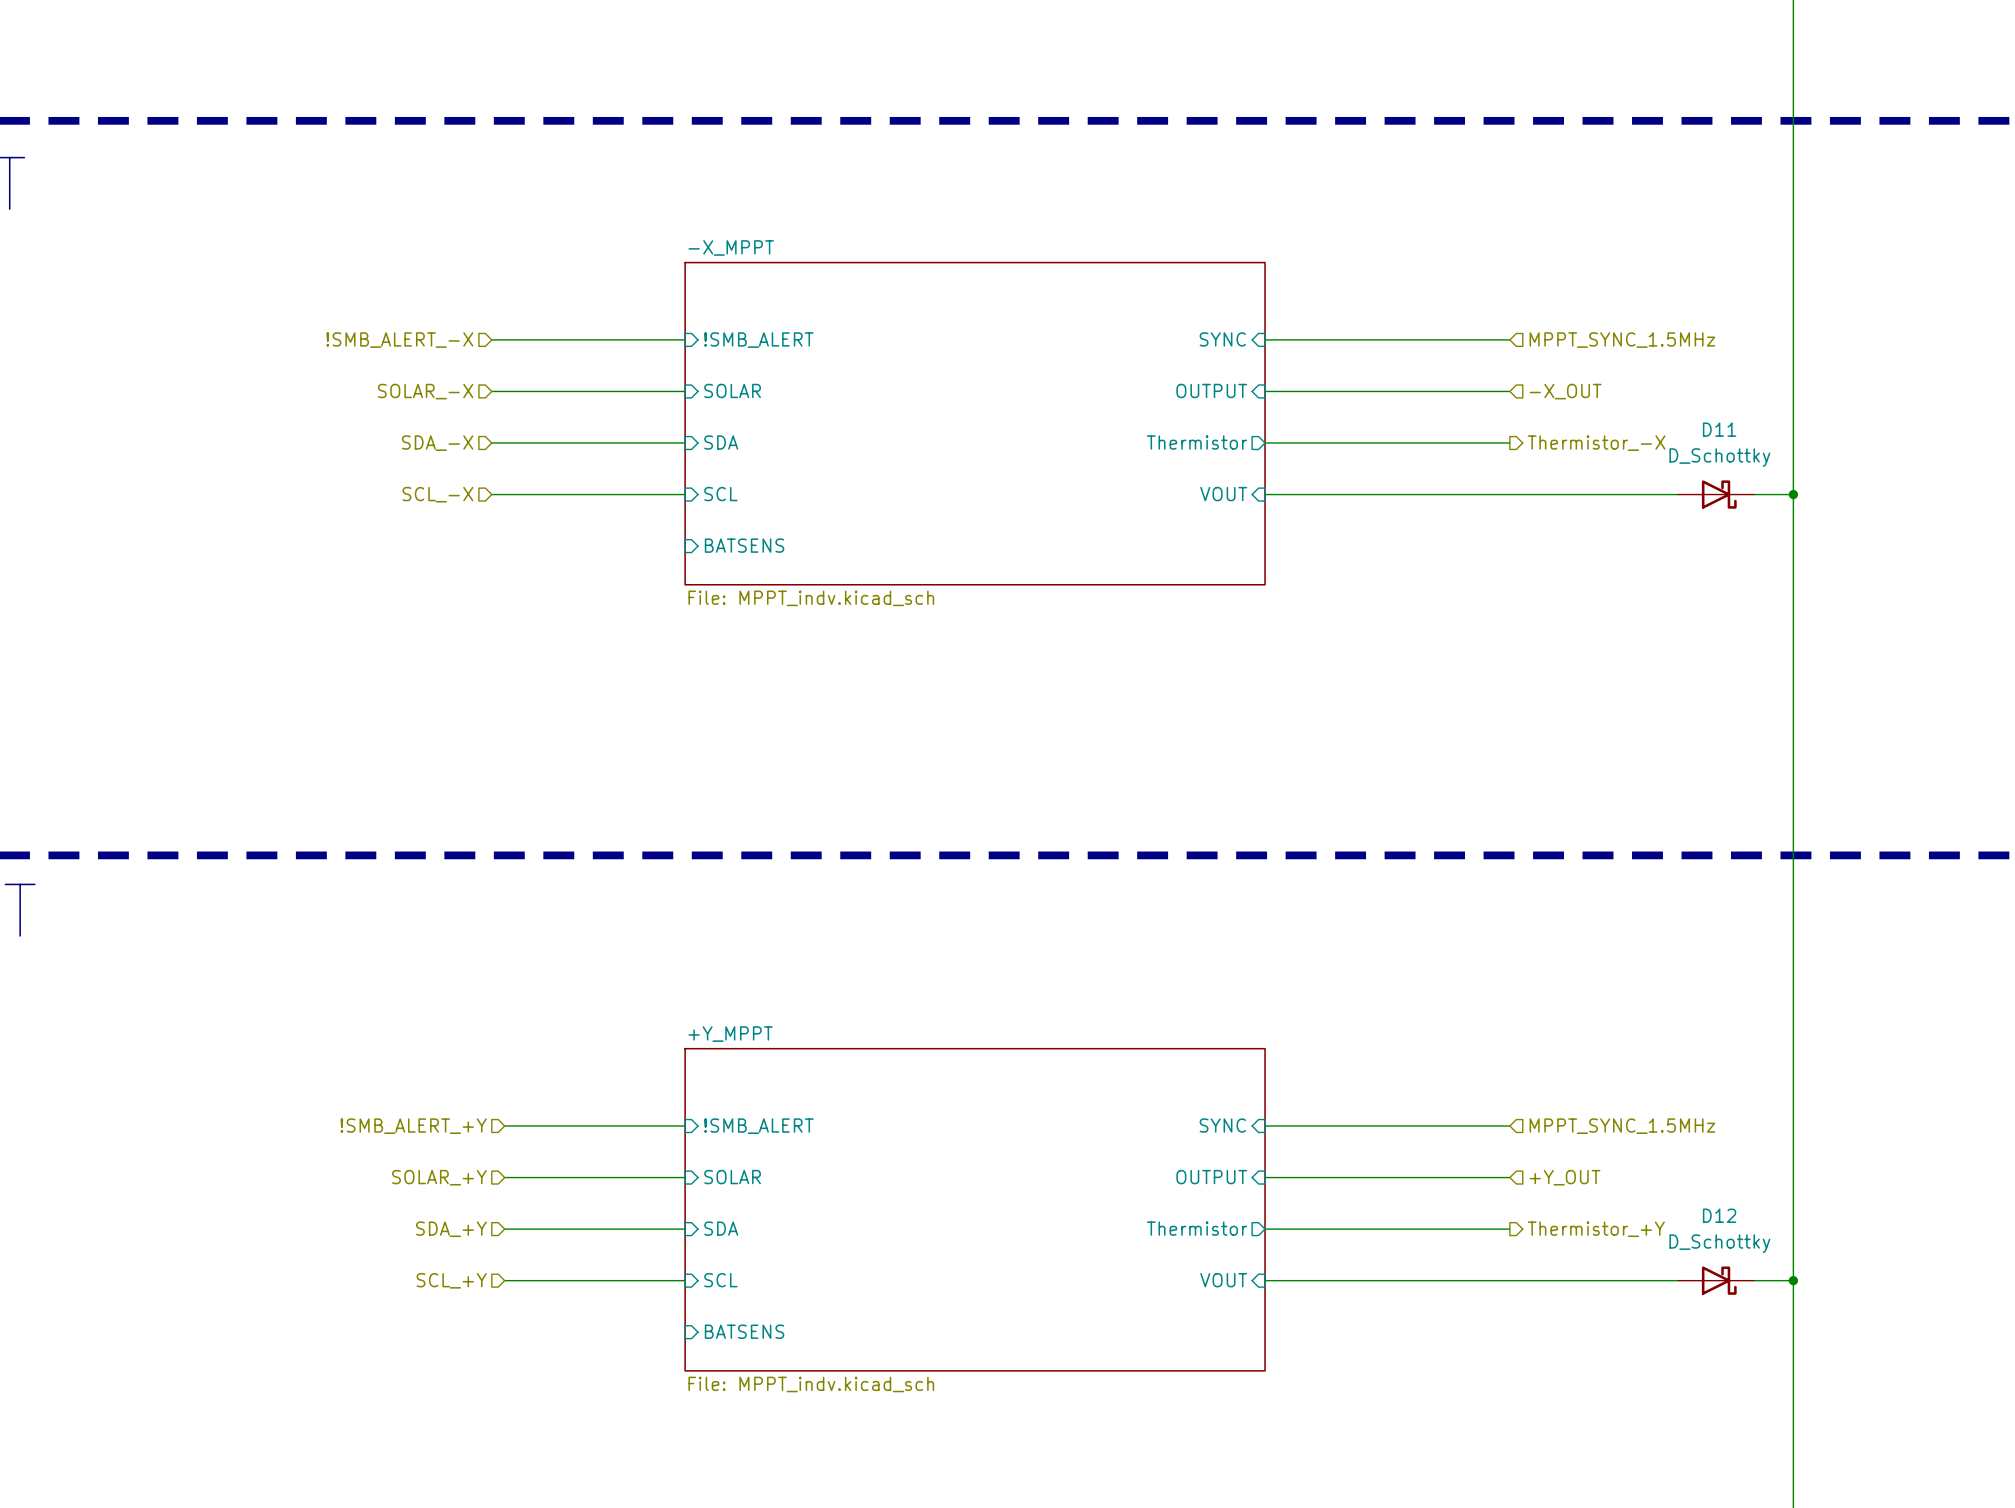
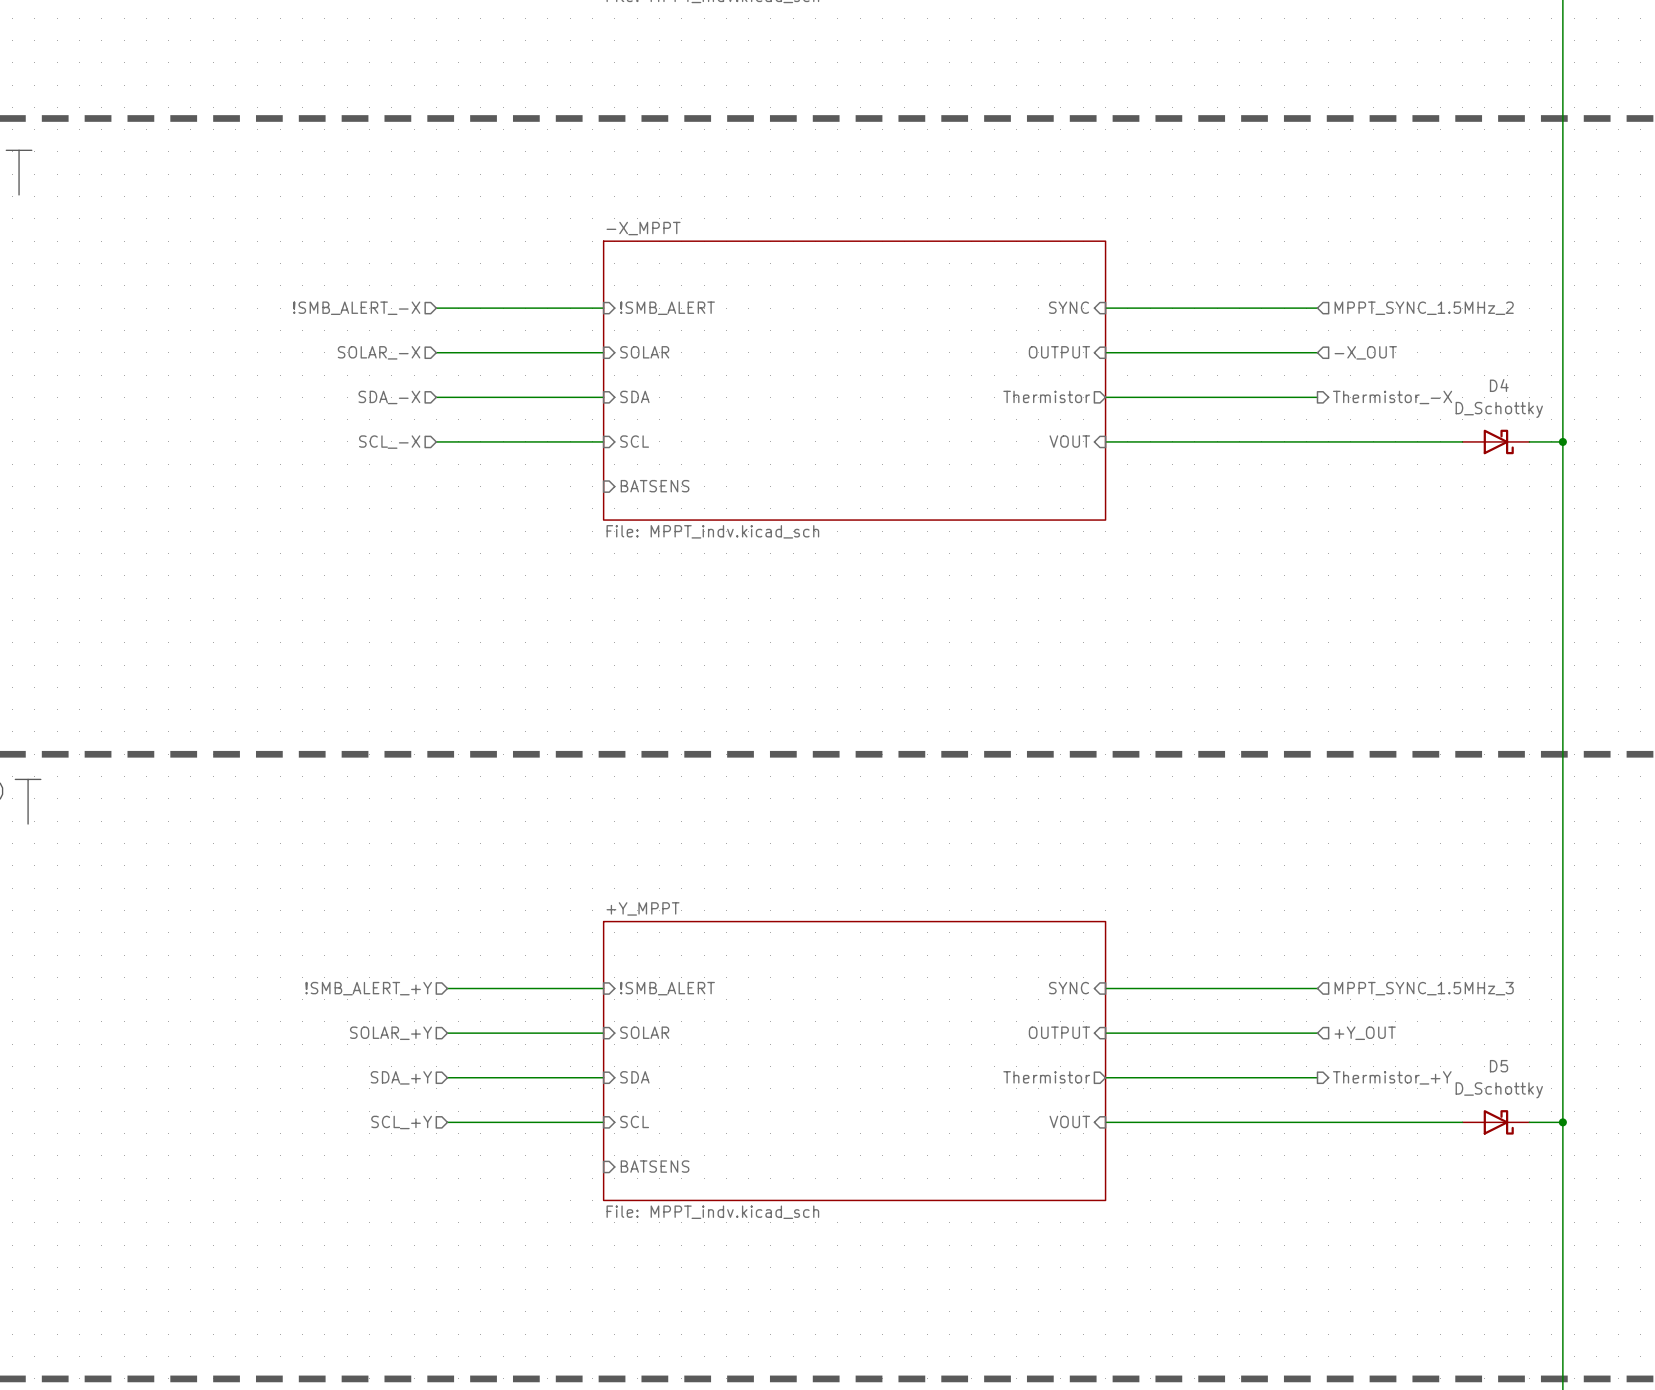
hierarchical label: MPPT_SYNC_1.5MHz (1622, 340) -> MPPT_SYNC_1.5MHz_2 (1424, 308)
D11 name: D11 (1719, 429) -> D4 (1499, 385)
hierarchical label: MPPT_SYNC_1.5MHz (1622, 1126) -> MPPT_SYNC_1.5MHz_3 (1424, 988)
D12 name: D12 (1719, 1215) -> D5 (1499, 1066)

